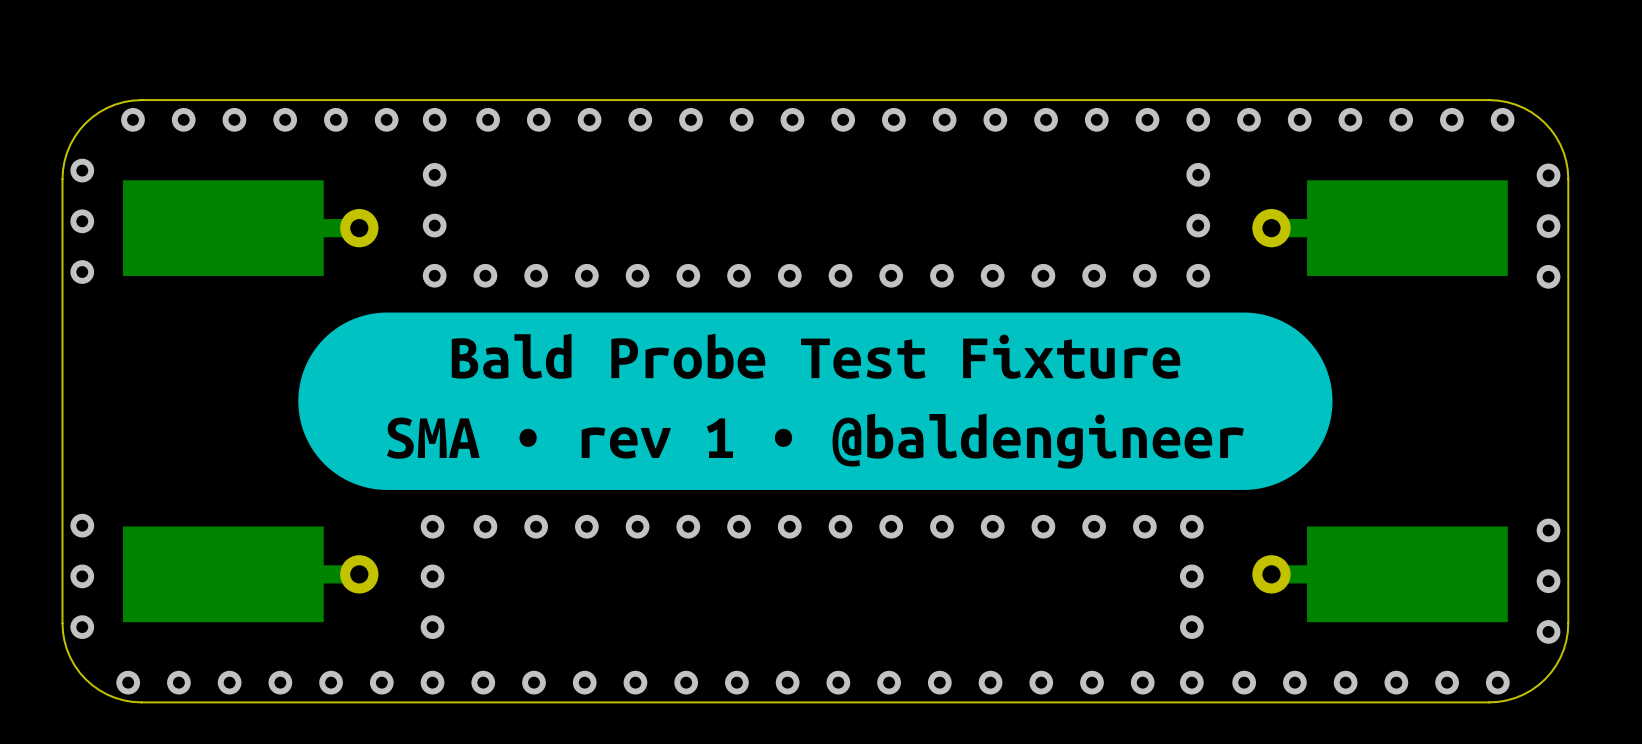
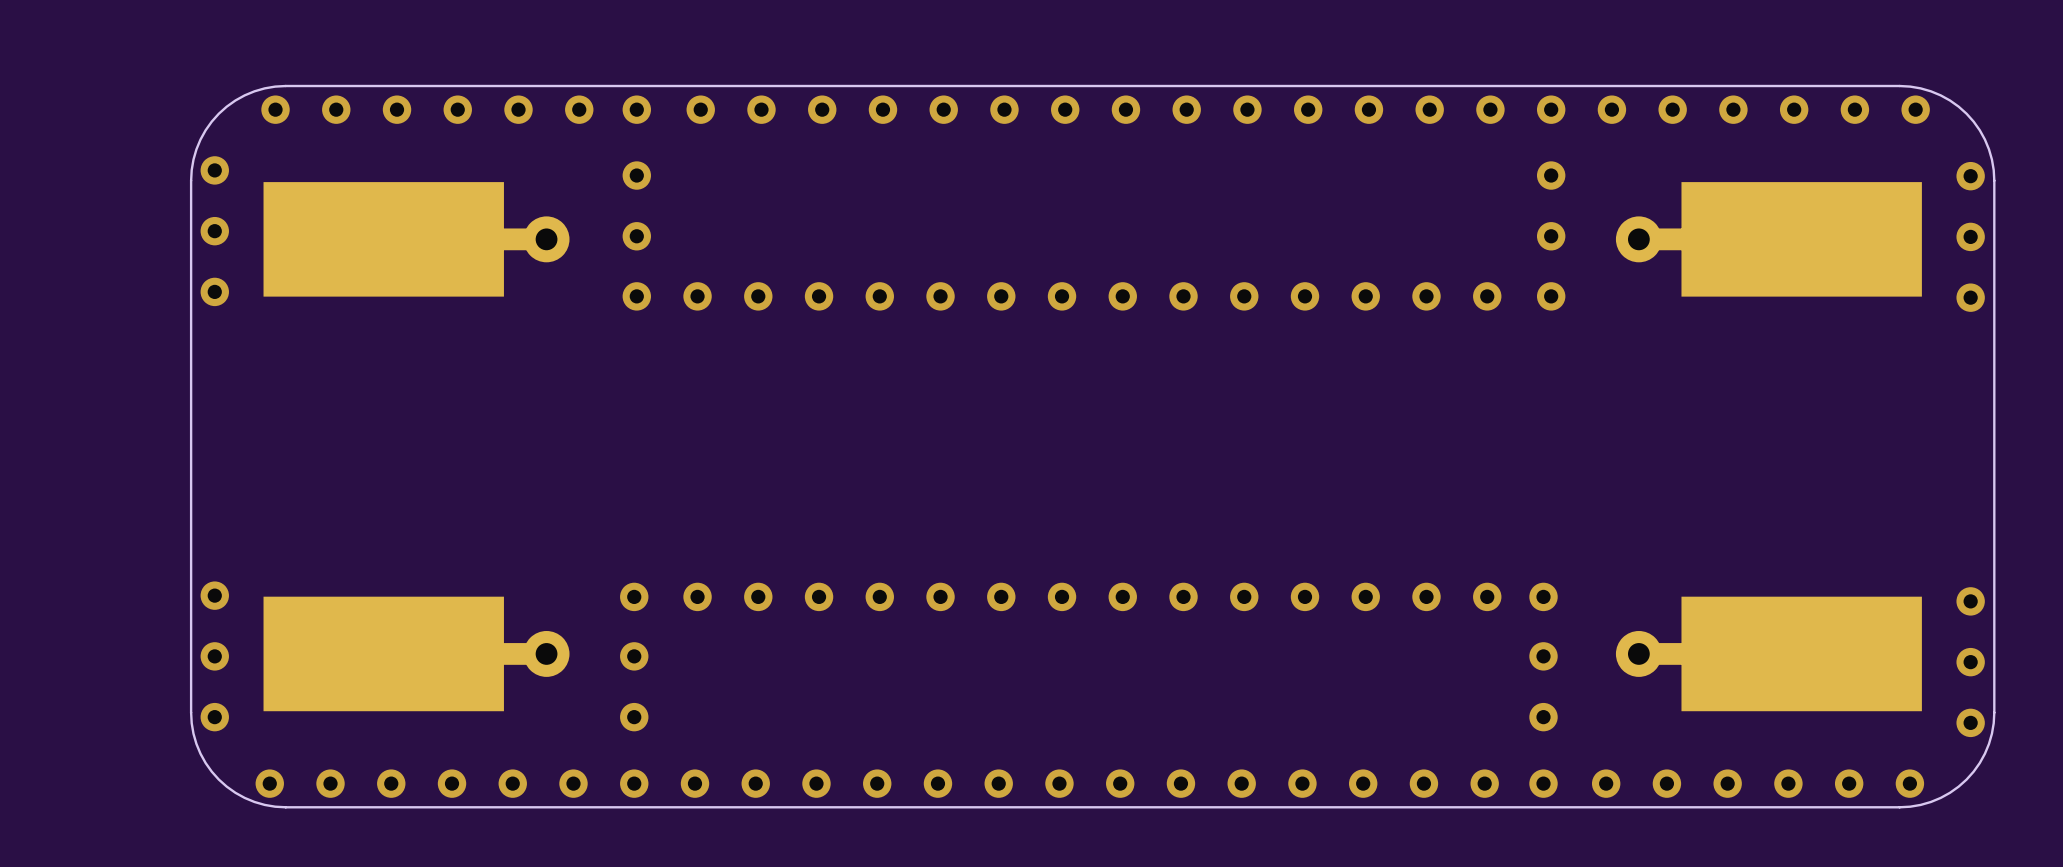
drawing: [298, 312, 1333, 490] -> none

